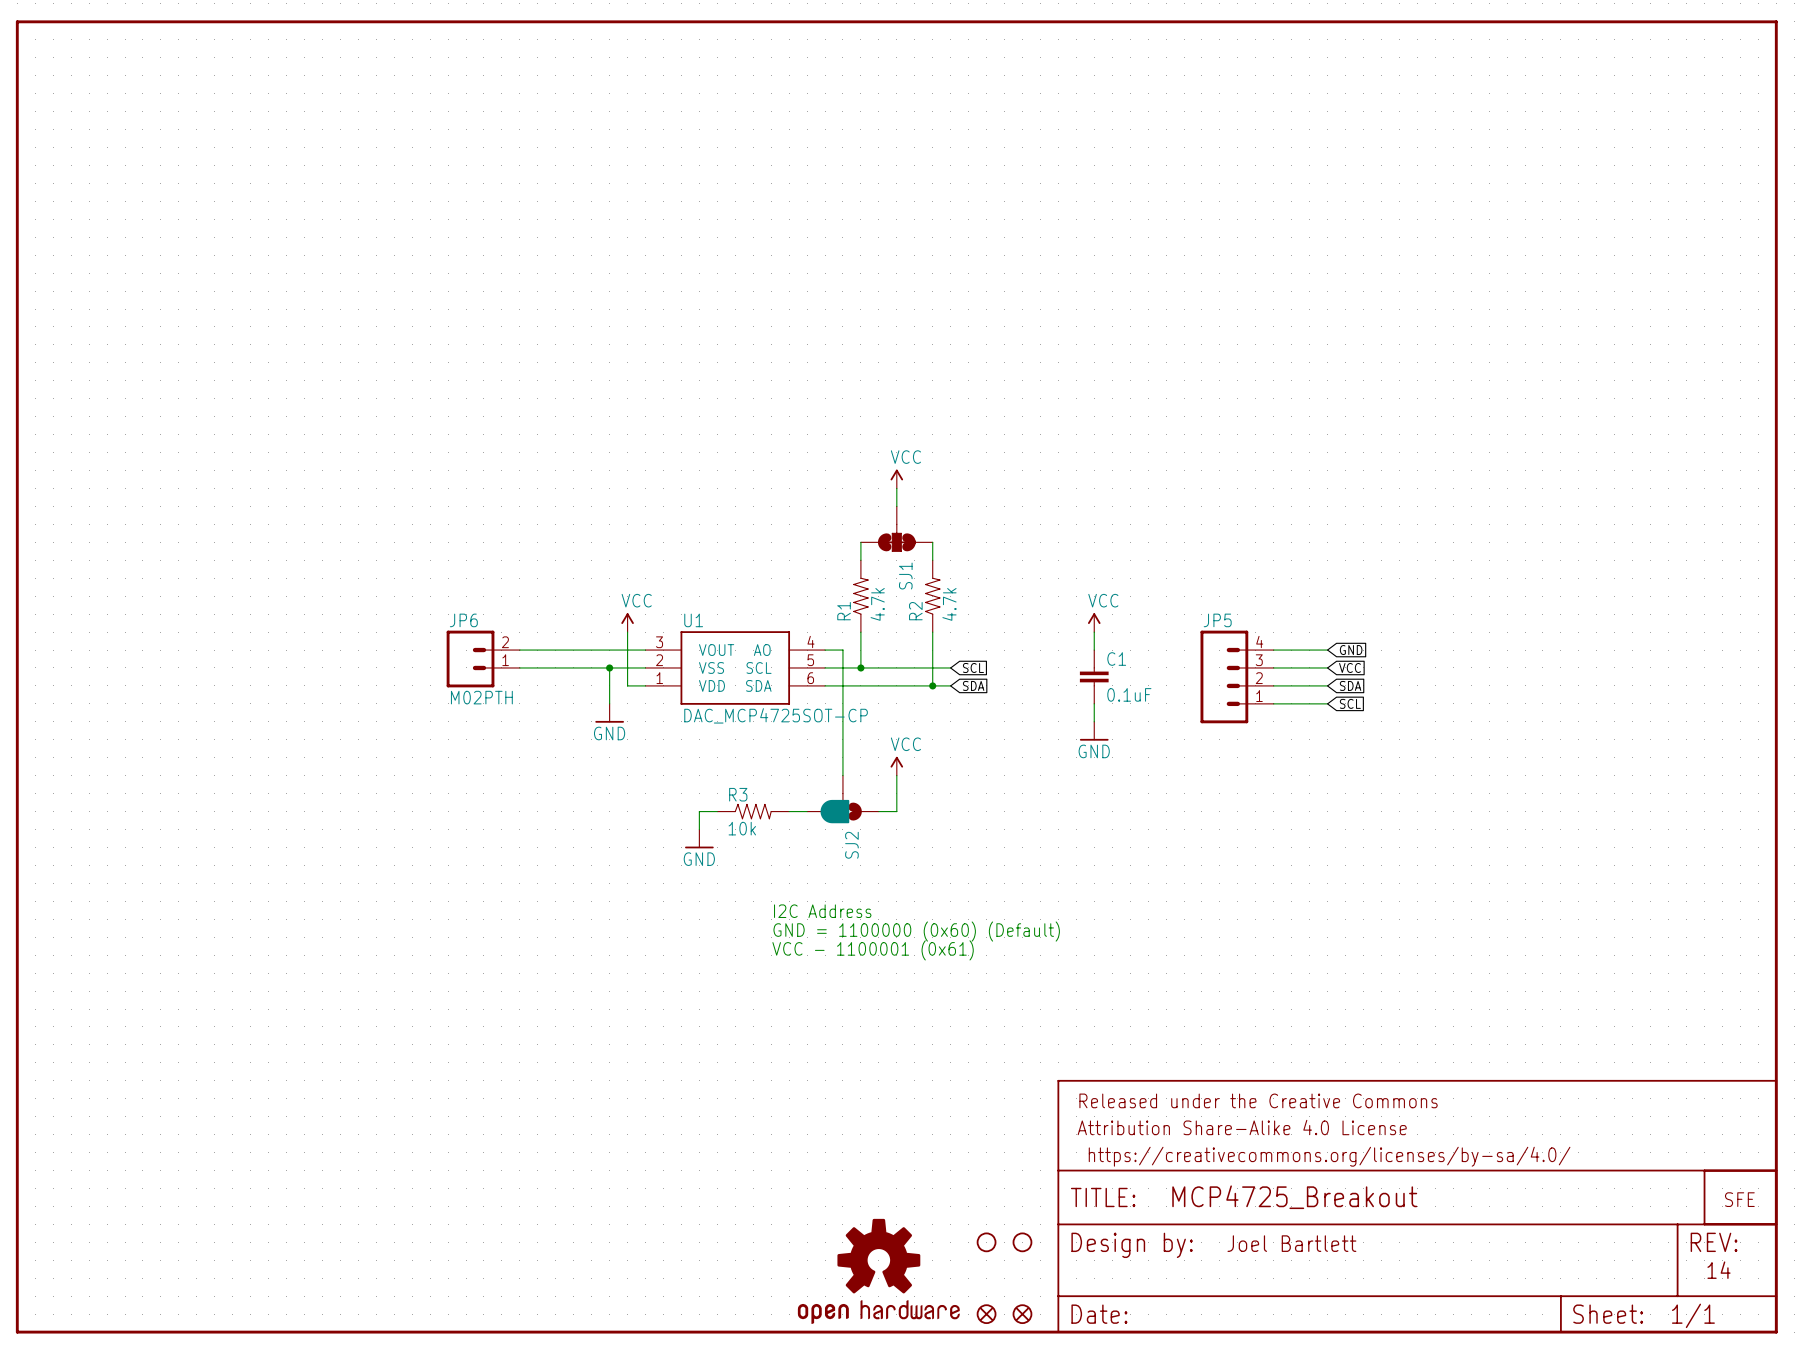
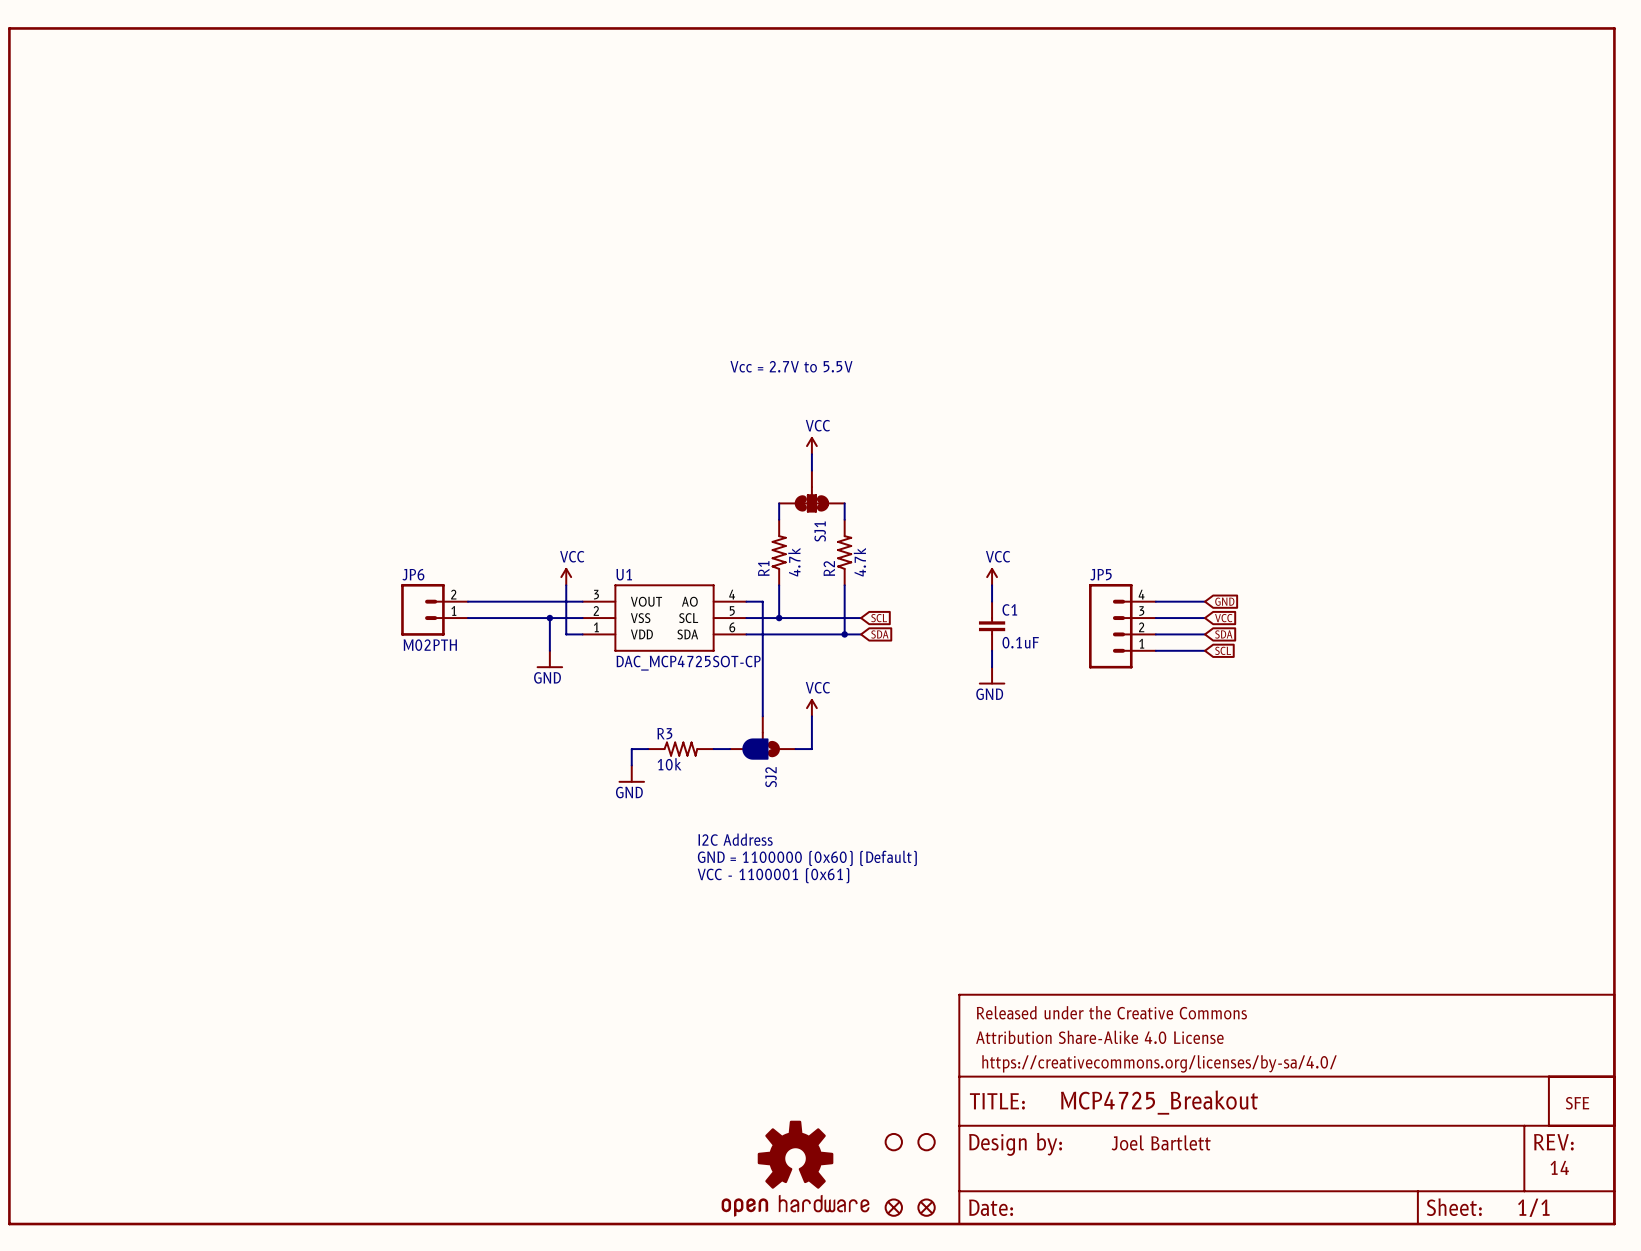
text: none -> Vcc = 2.7V to 5.5V (791, 366)

